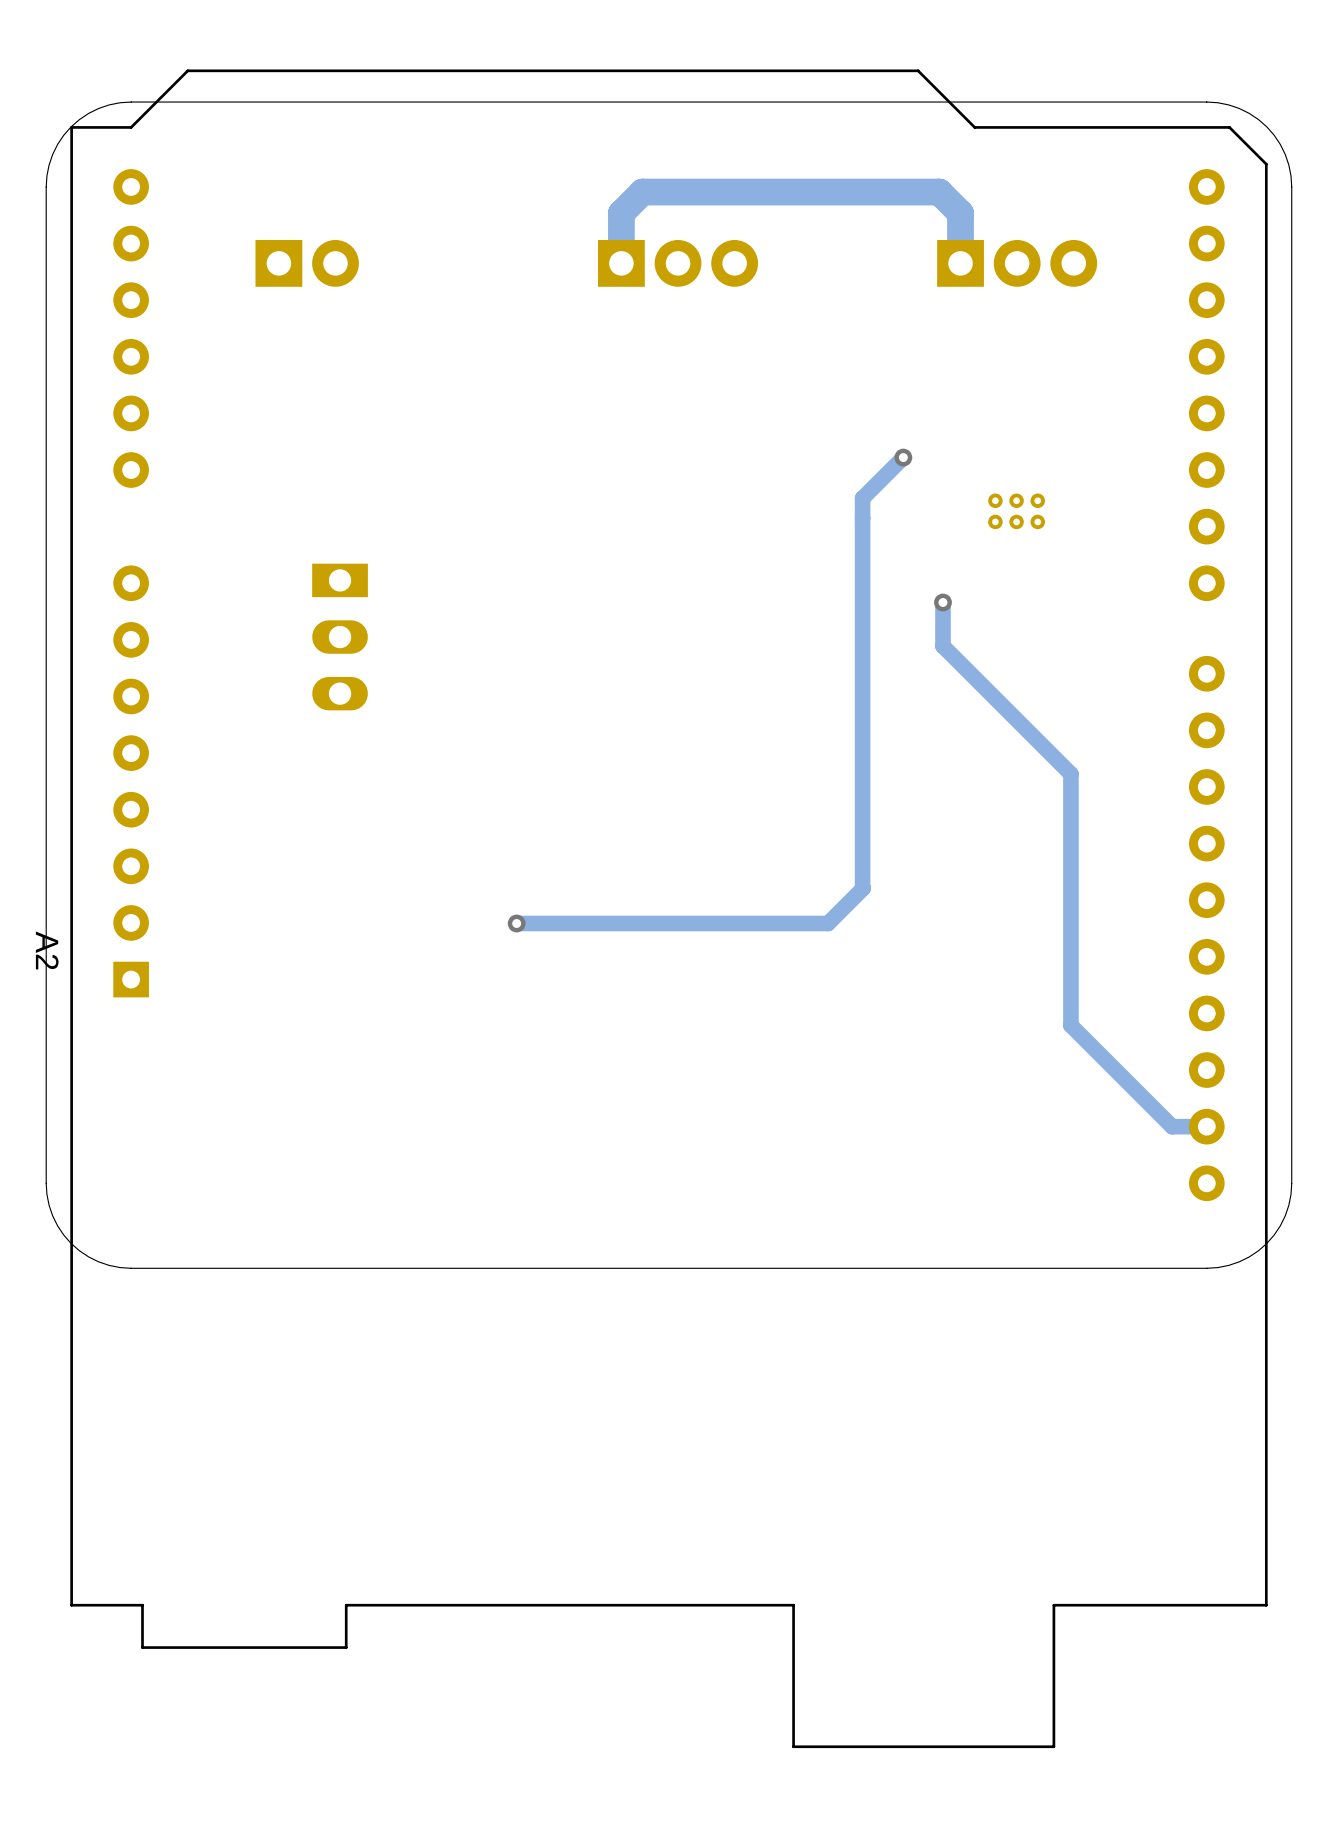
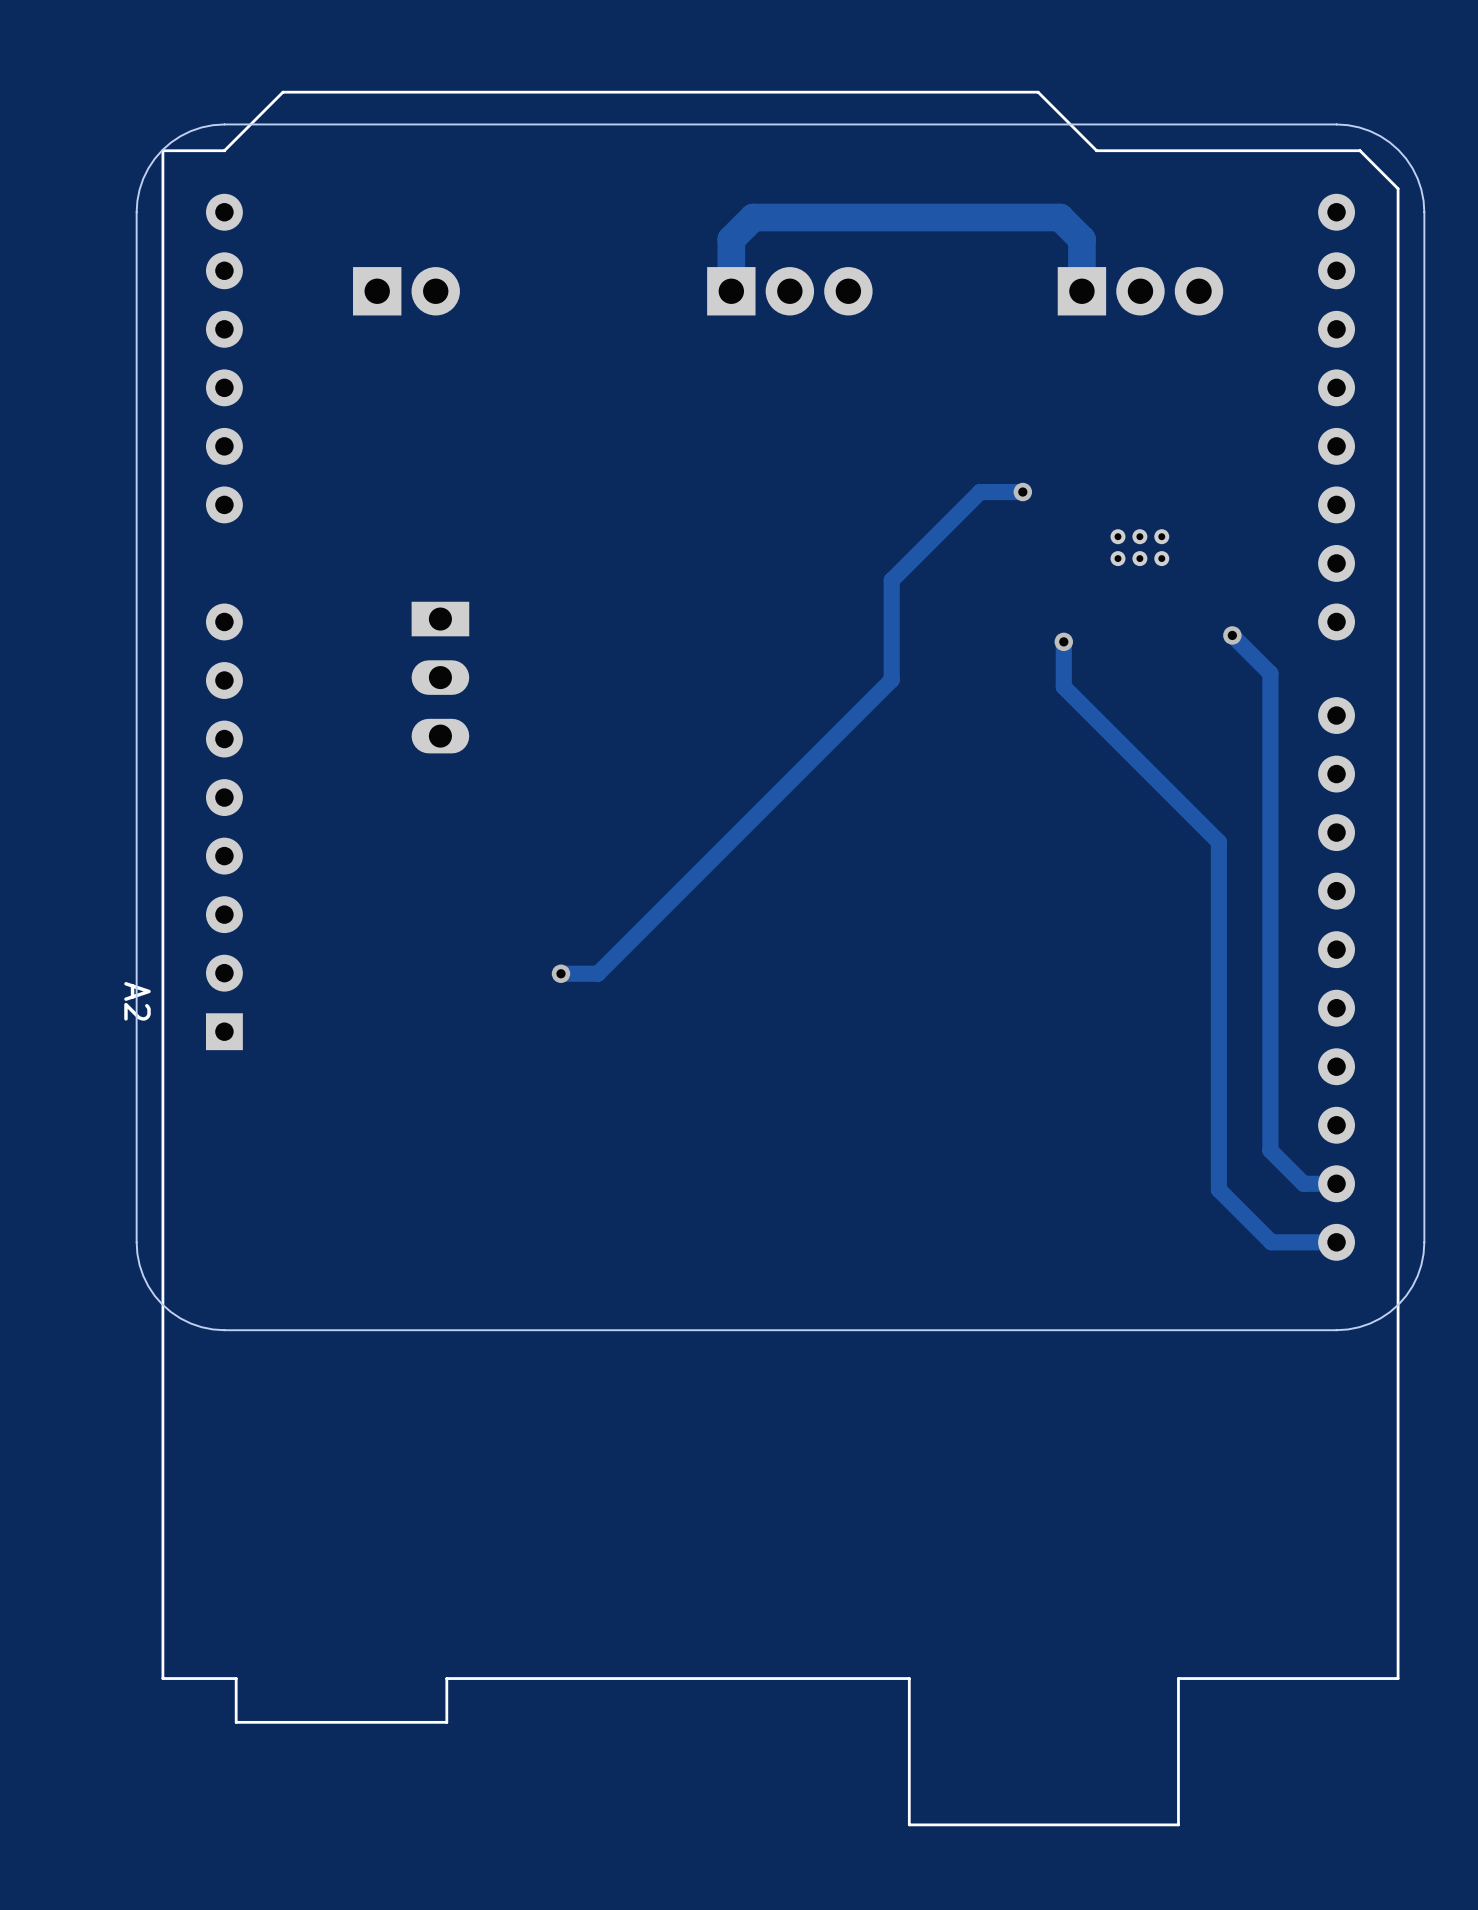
track: (903, 457) (862, 498) (863, 888) (828, 923) (516, 923) -> (1022, 492) (980, 492) (891, 580) (891, 679) (597, 973) (561, 973)
track: none -> (1232, 635) (1270, 673) (1270, 1150) (1303, 1183)
via: none -> (1232, 635)
track: (1070, 774) (1070, 1025) (1172, 1126) (1175, 1126) -> (1196, 819) (1218, 842) (1218, 1189) (1271, 1242) (1336, 1242)
via position: (516, 923) -> (561, 973)

